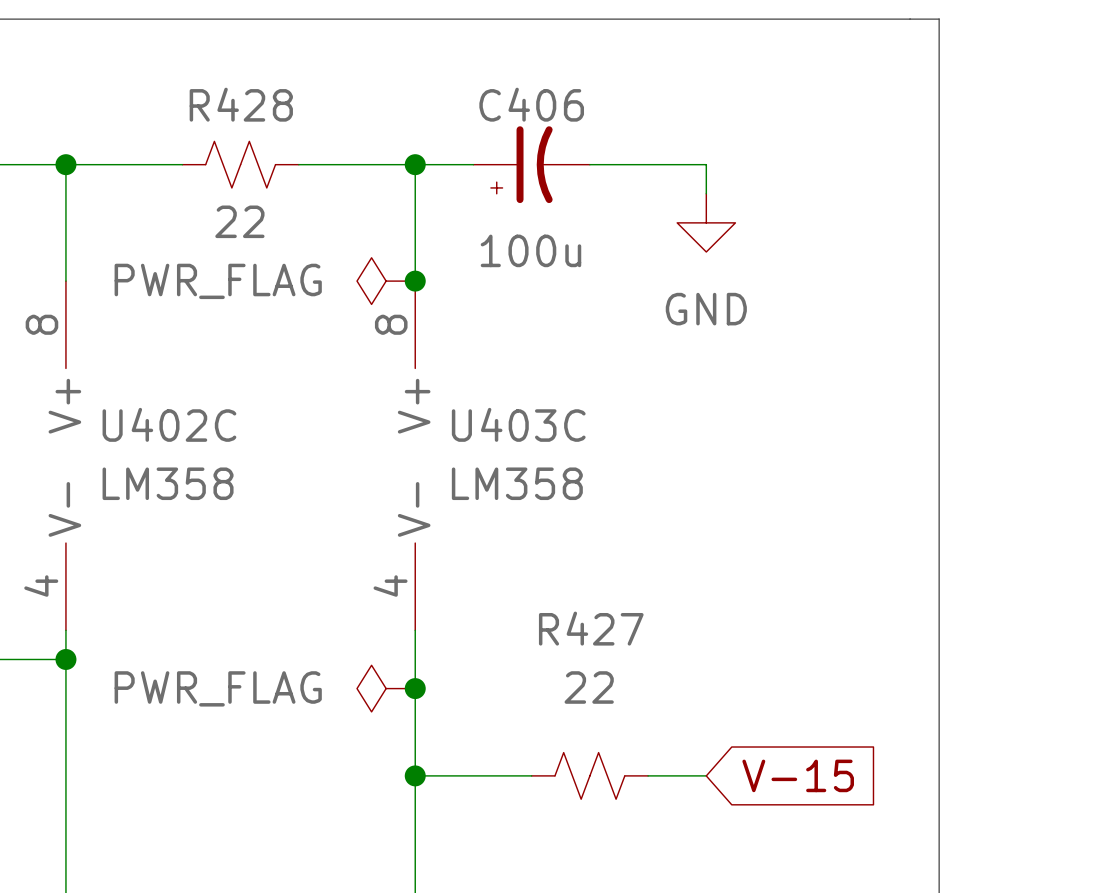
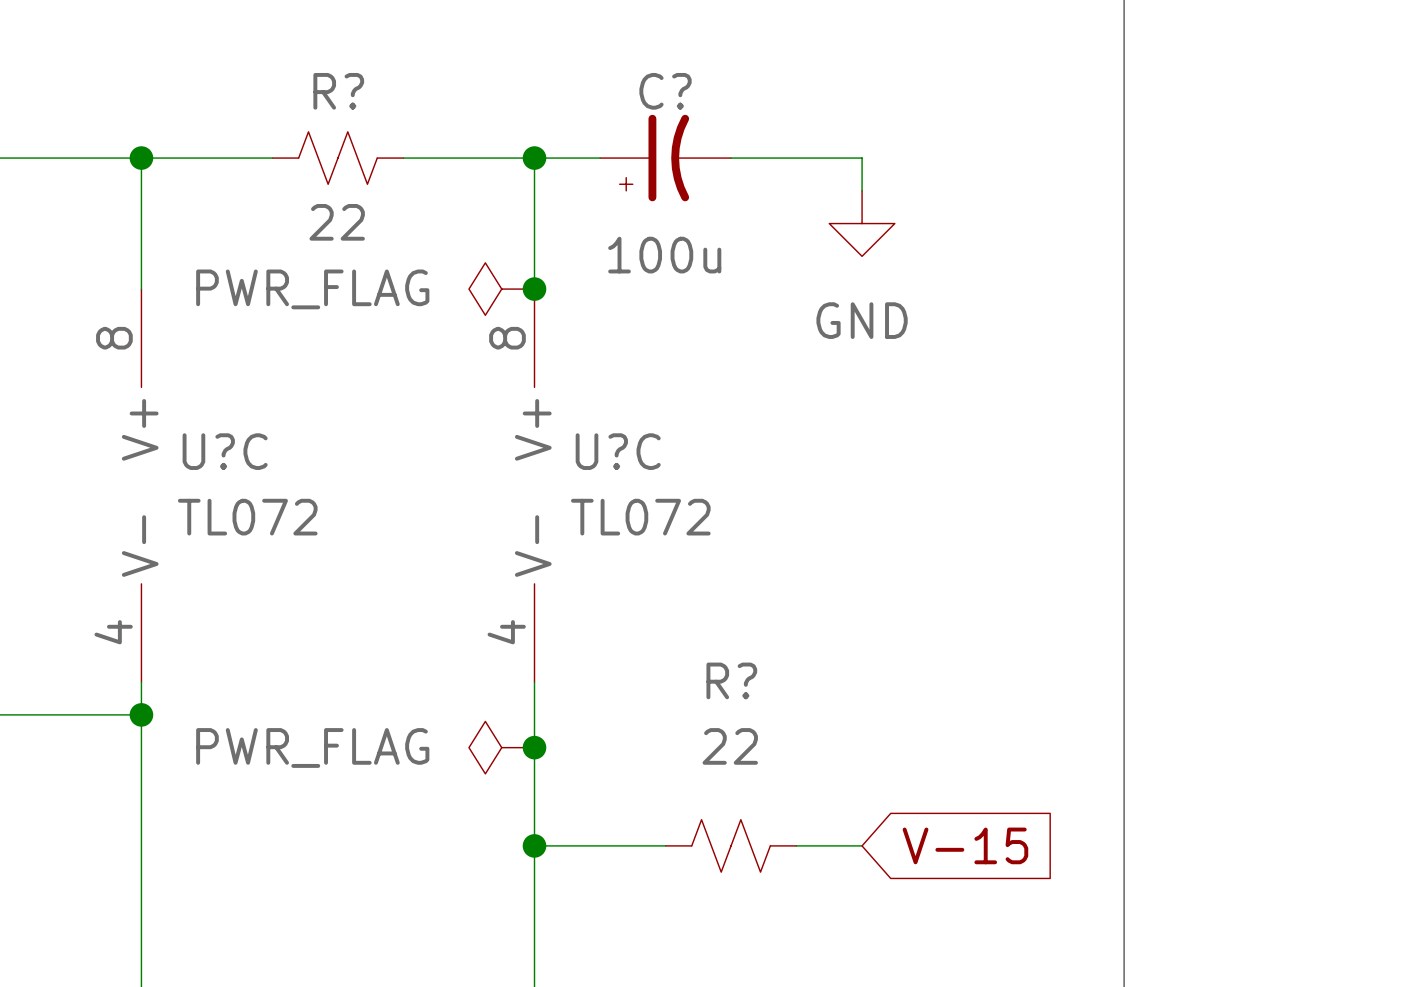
R428 name: R428 (241, 104) -> R? (338, 91)
C406 name: C406 (531, 104) -> C? (665, 91)
U402C name: U402C (169, 424) -> U?C (225, 451)
U403C name: U403C (518, 424) -> U?C (618, 451)
U402C value: LM358 (168, 483) -> TL072 (247, 517)
U403C value: LM358 (517, 483) -> TL072 (640, 517)
R427 name: R427 (591, 628) -> R? (731, 680)

